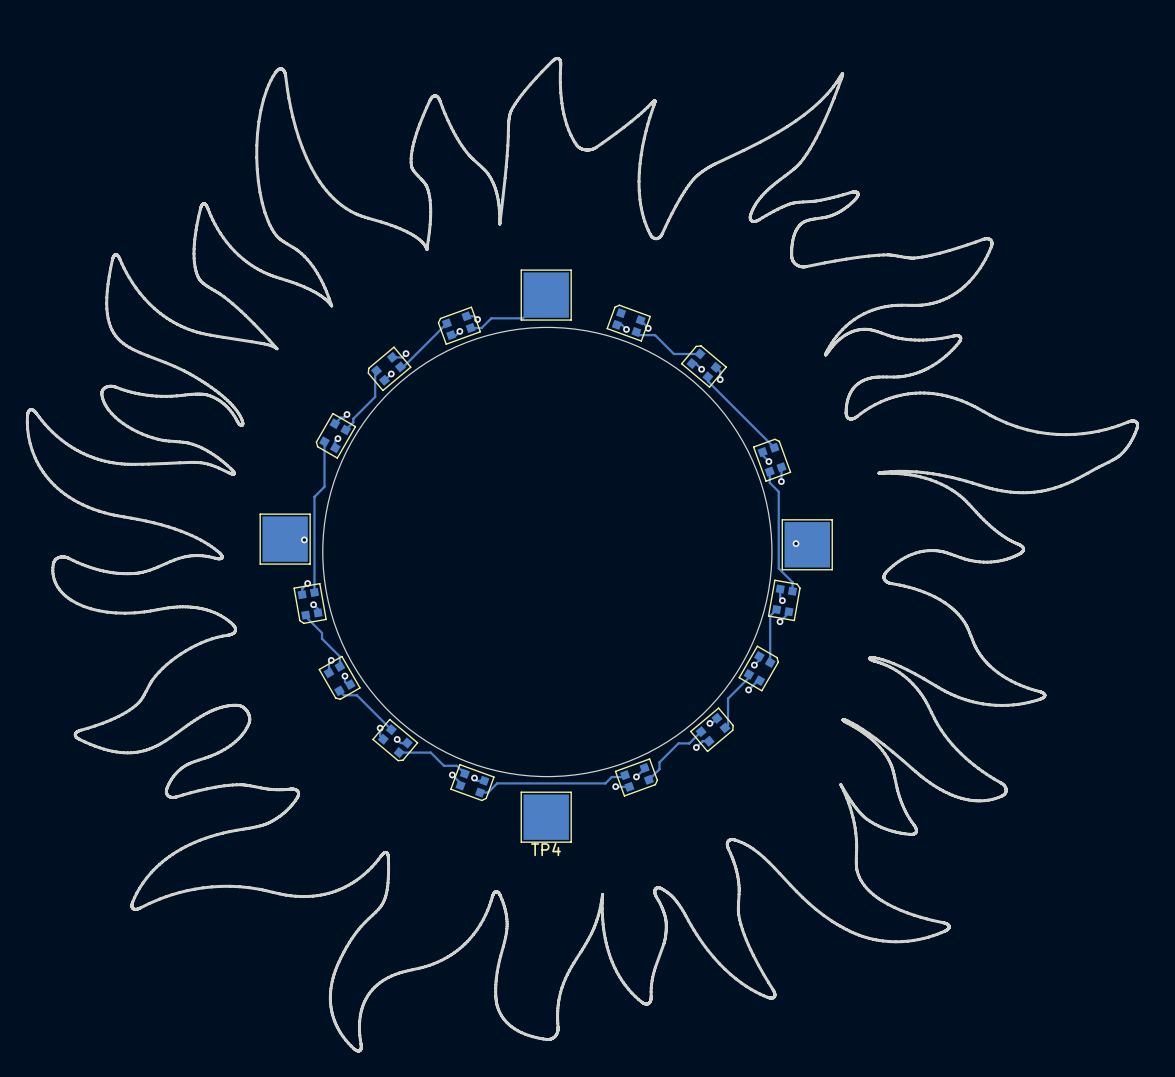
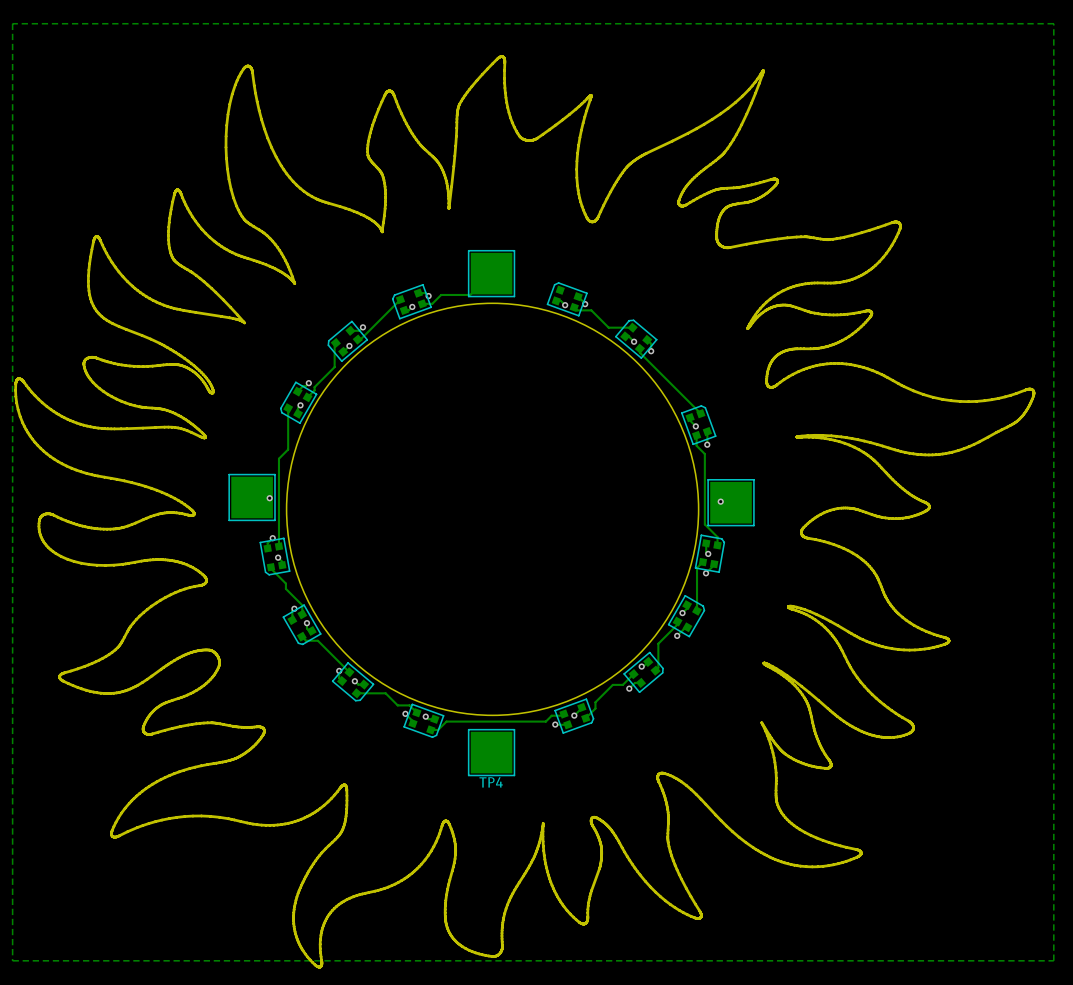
zone outline: none -> (1053, 23) (12, 23) (12, 960) (1053, 960) (1053, 23)

